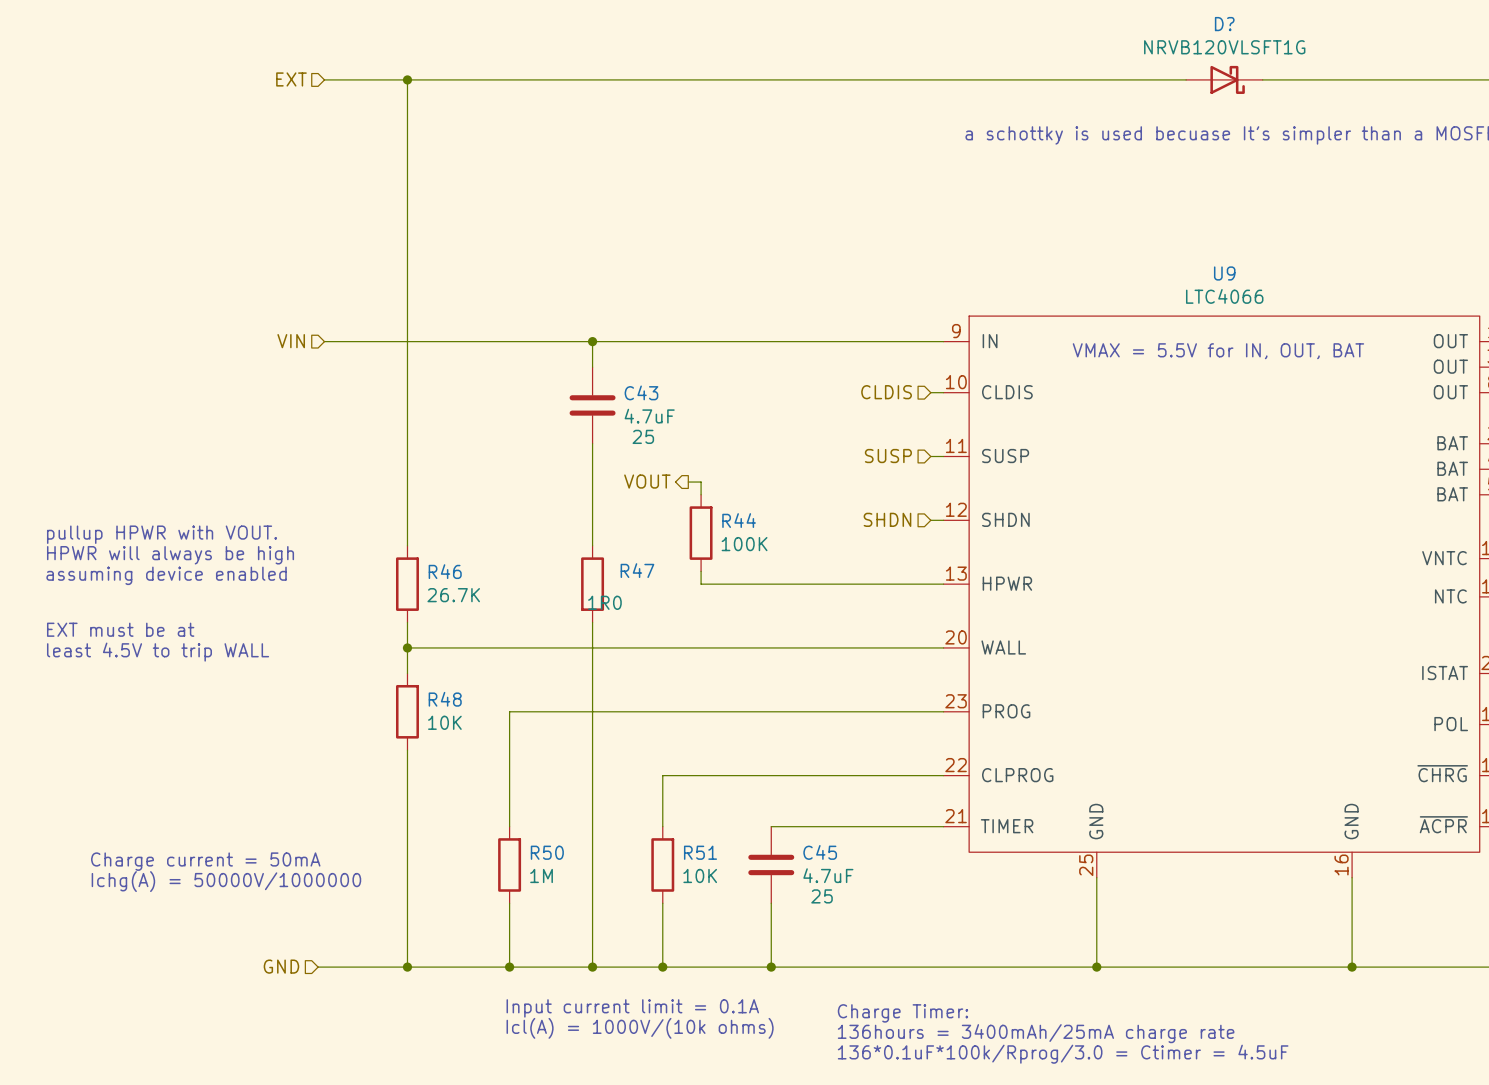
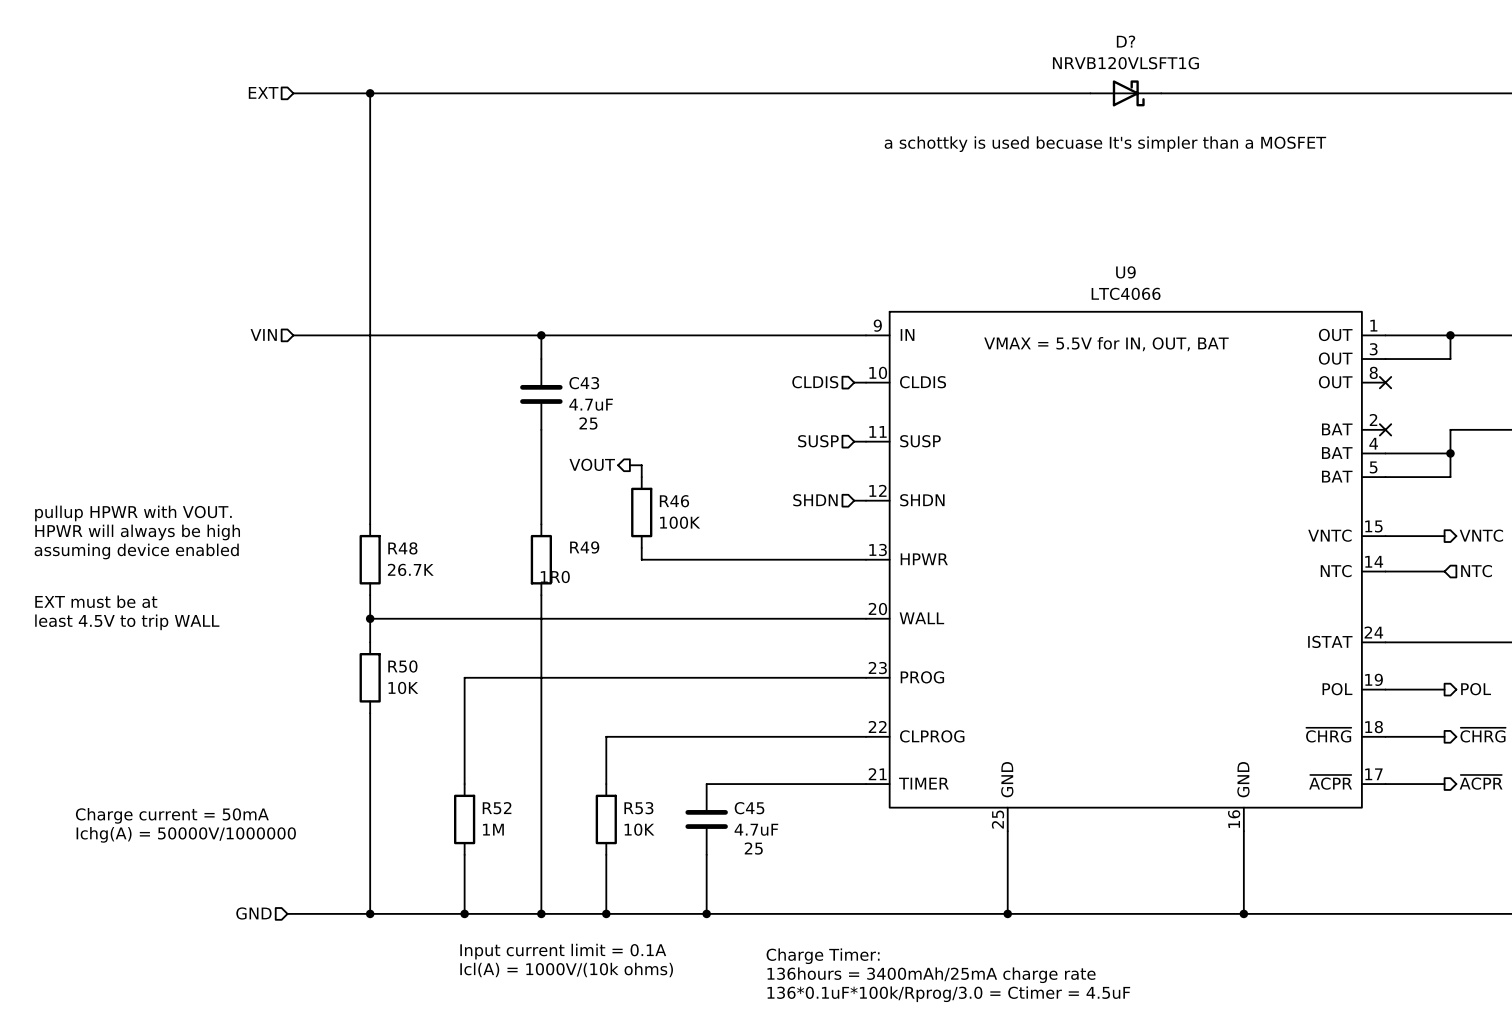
R44 name: R44 (739, 520) -> R46 (674, 501)
R47 name: R47 (637, 570) -> R49 (584, 547)
R46 name: R46 (445, 571) -> R48 (402, 548)
R48 name: R48 (445, 699) -> R50 (402, 666)
R50 name: R50 (547, 852) -> R52 (497, 808)
R51 name: R51 (700, 852) -> R53 (638, 808)

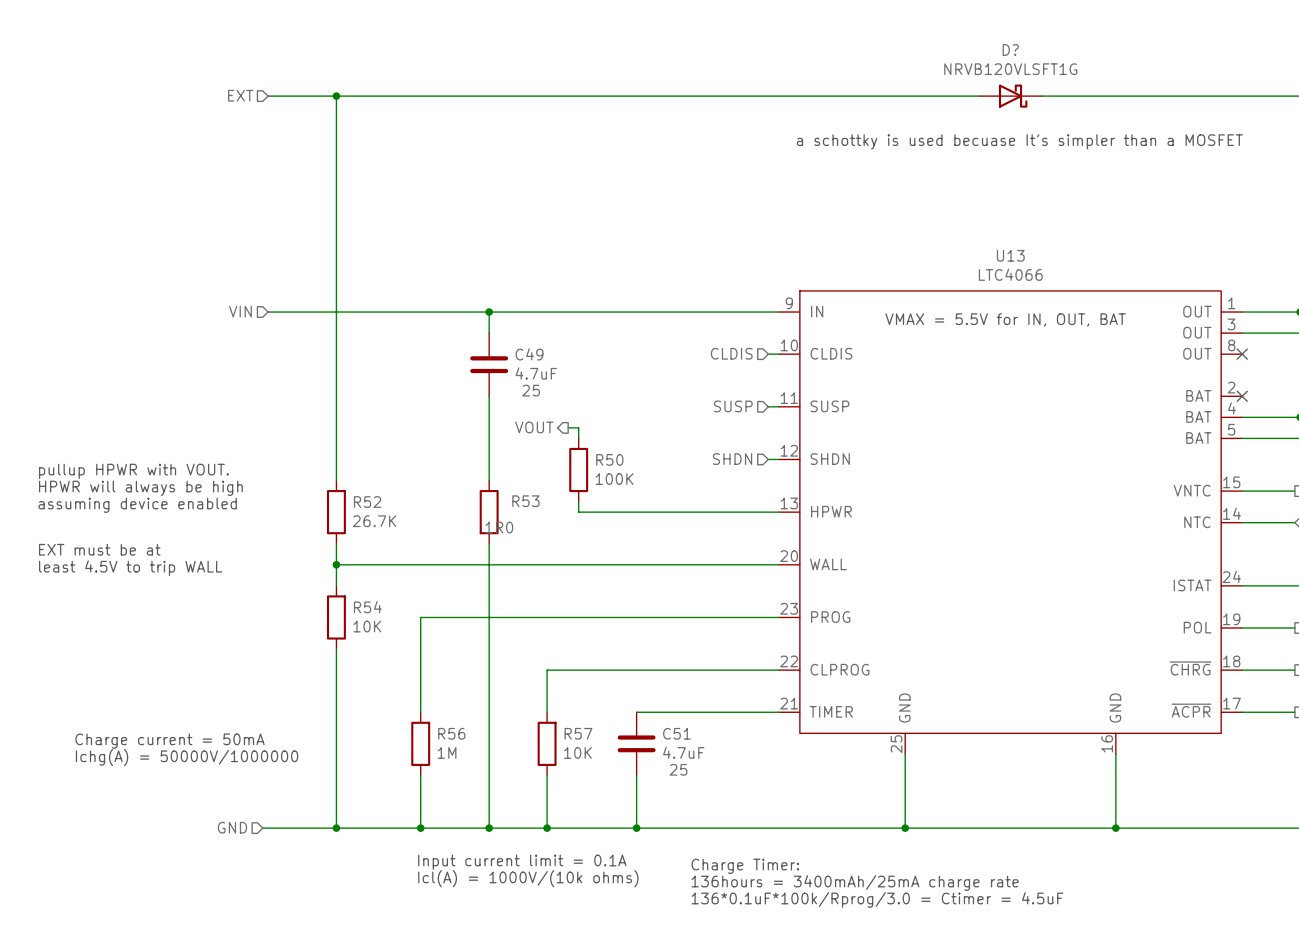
U9 name: U9 (1125, 272) -> U13 (1010, 255)
C43 name: C43 (584, 383) -> C49 (529, 354)
R46 name: R46 (674, 501) -> R50 (609, 459)
R49 name: R49 (584, 547) -> R53 (525, 501)
R48 name: R48 (402, 548) -> R52 (367, 502)
R50 name: R50 (402, 666) -> R54 (367, 607)
R52 name: R52 (497, 808) -> R56 (451, 733)
R53 name: R53 (638, 808) -> R57 (578, 733)
C45 name: C45 (749, 808) -> C51 (676, 733)

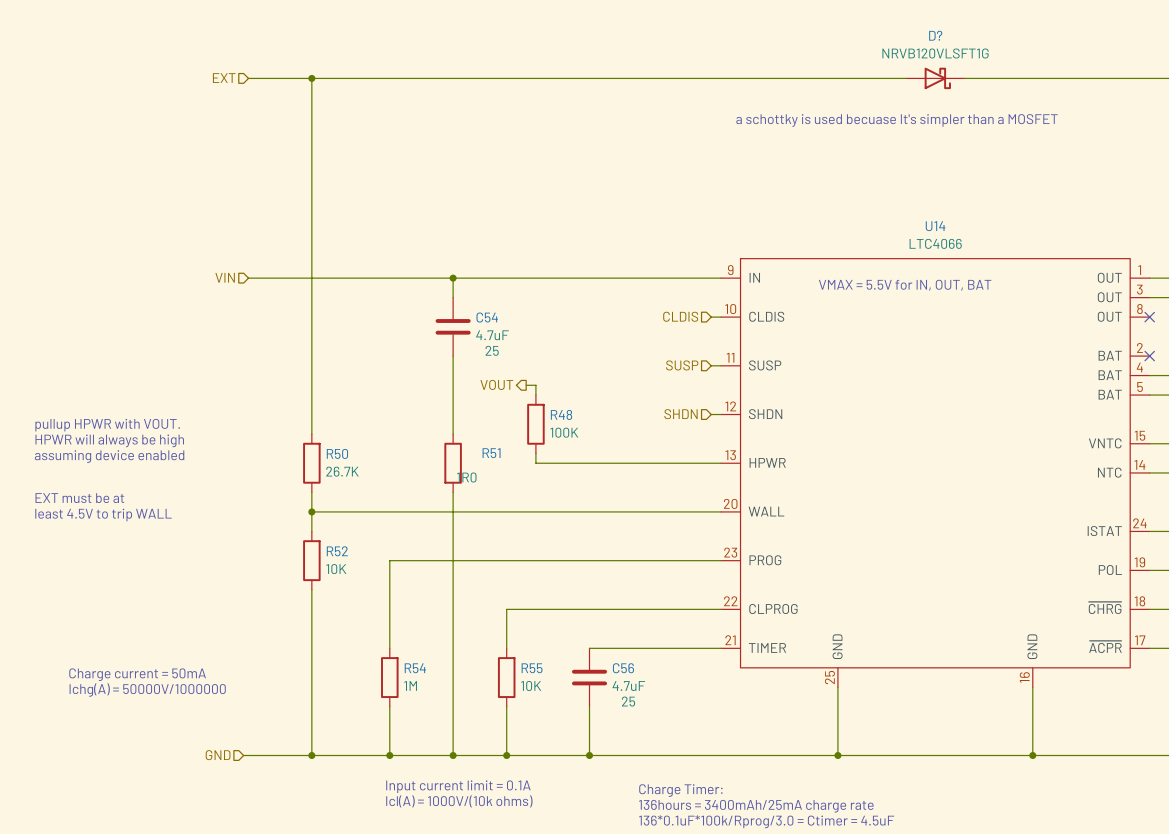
U13 name: U13 (1010, 255) -> U14 (935, 226)
C49 name: C49 (529, 354) -> C54 (487, 317)
R50 name: R50 (609, 459) -> R48 (561, 414)
R53 name: R53 (525, 501) -> R51 (491, 453)
R52 name: R52 (367, 502) -> R50 (337, 453)
R54 name: R54 (367, 607) -> R52 (337, 551)
R56 name: R56 (451, 733) -> R54 (415, 668)
R57 name: R57 (578, 733) -> R55 (532, 668)
C51 name: C51 (676, 733) -> C56 (623, 668)

